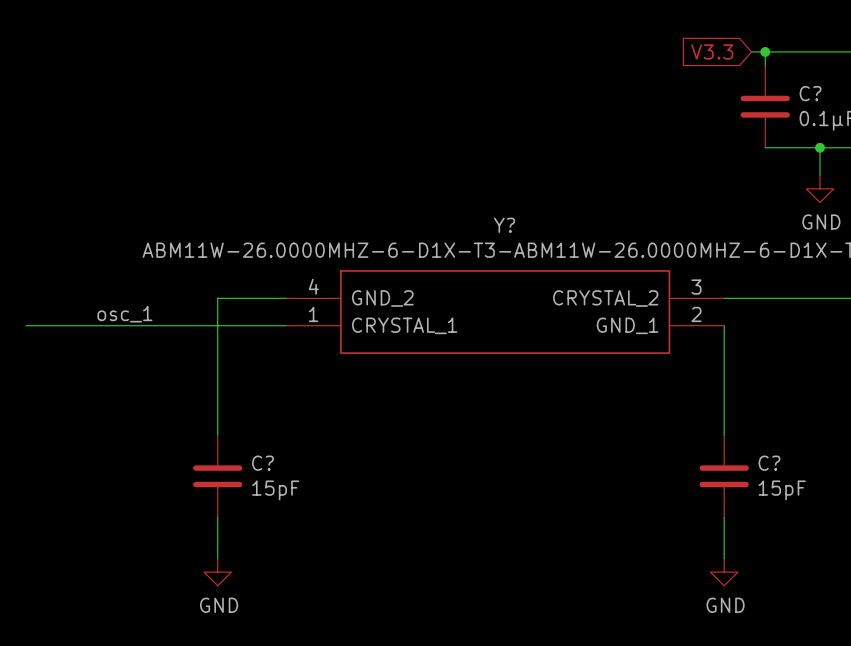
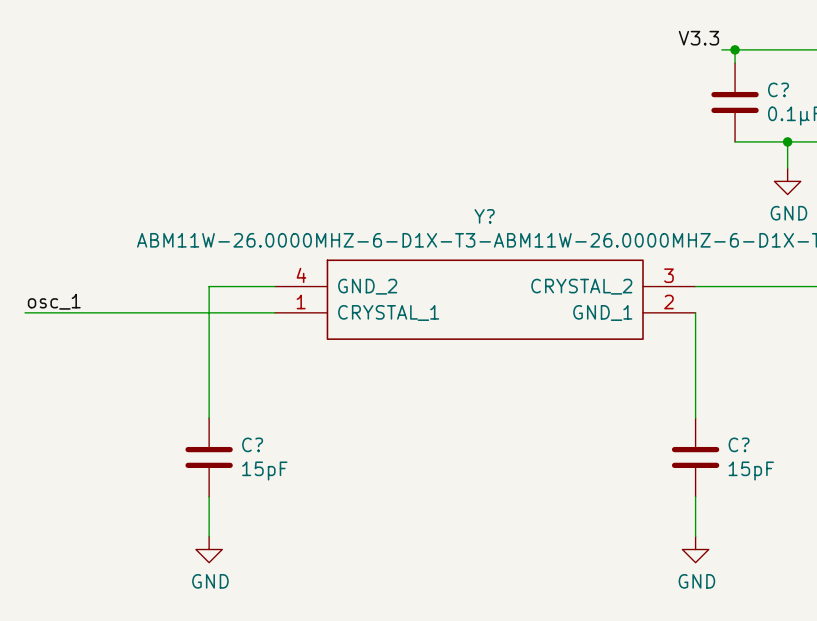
label: none -> V3.3 (698, 38)
global label: V3.3 (712, 51) -> none
label position: osc_1 (124, 314) -> osc_1 (54, 301)

